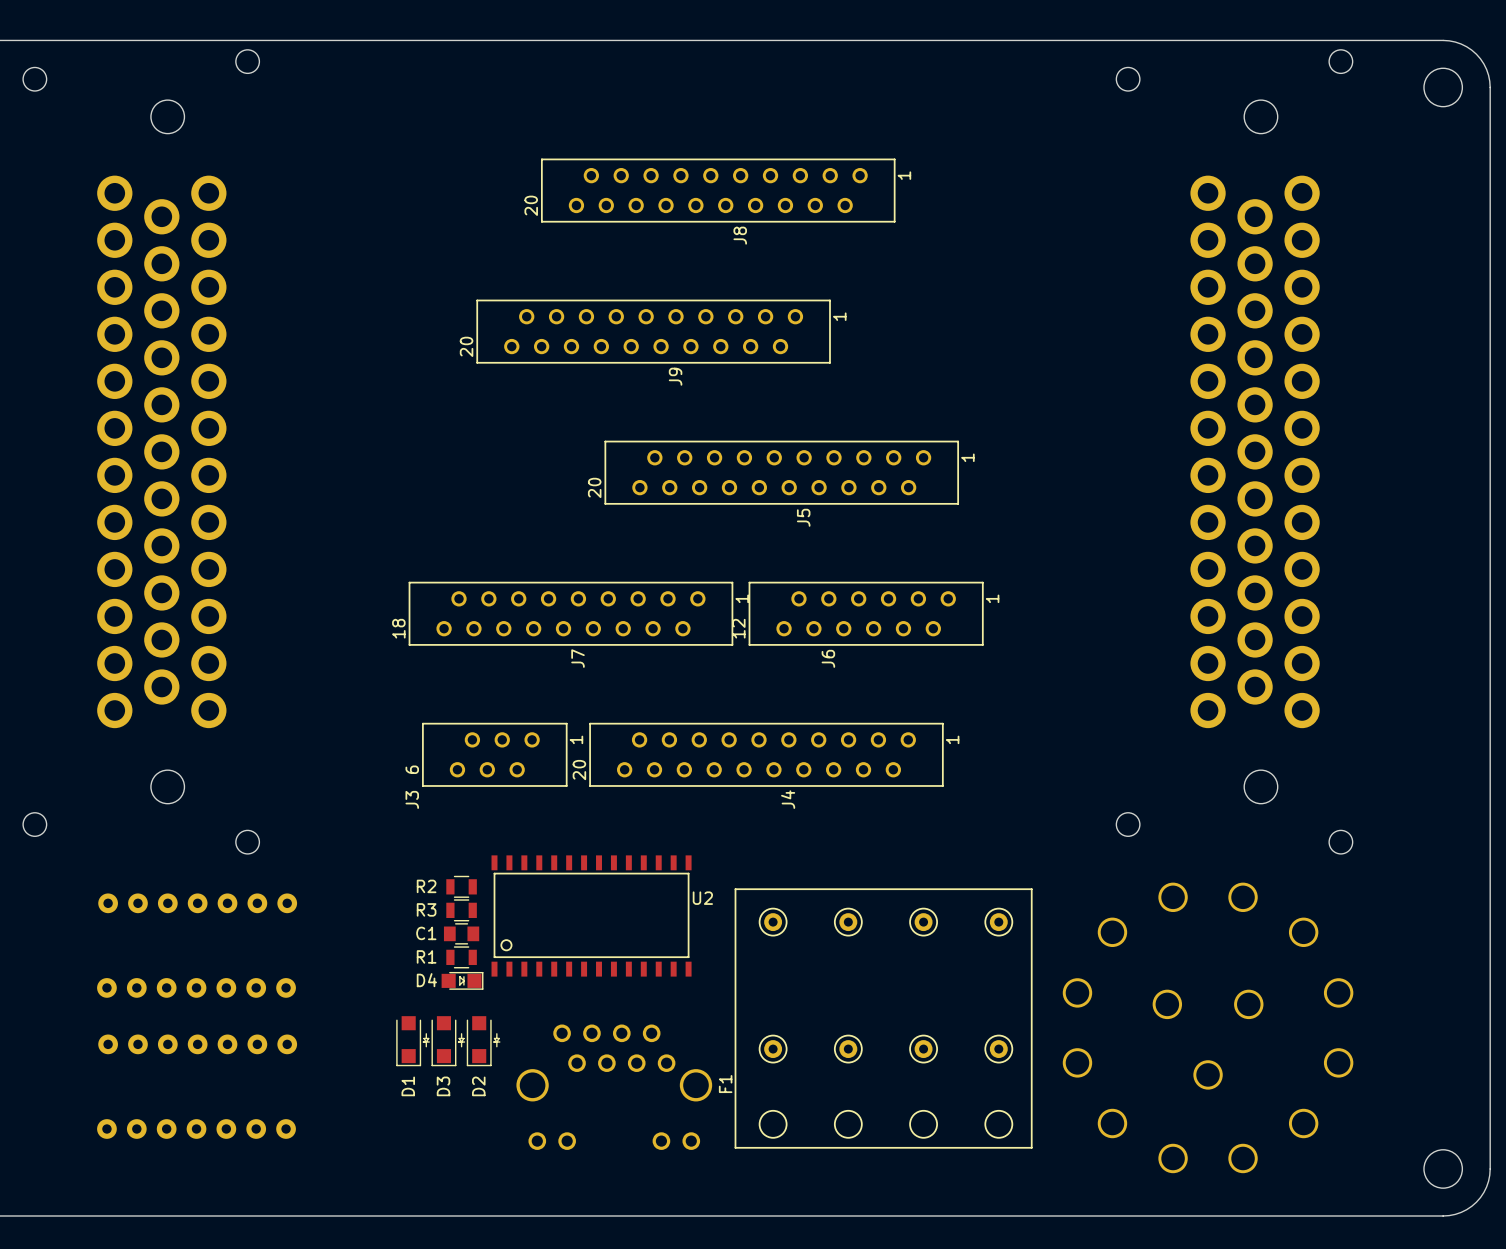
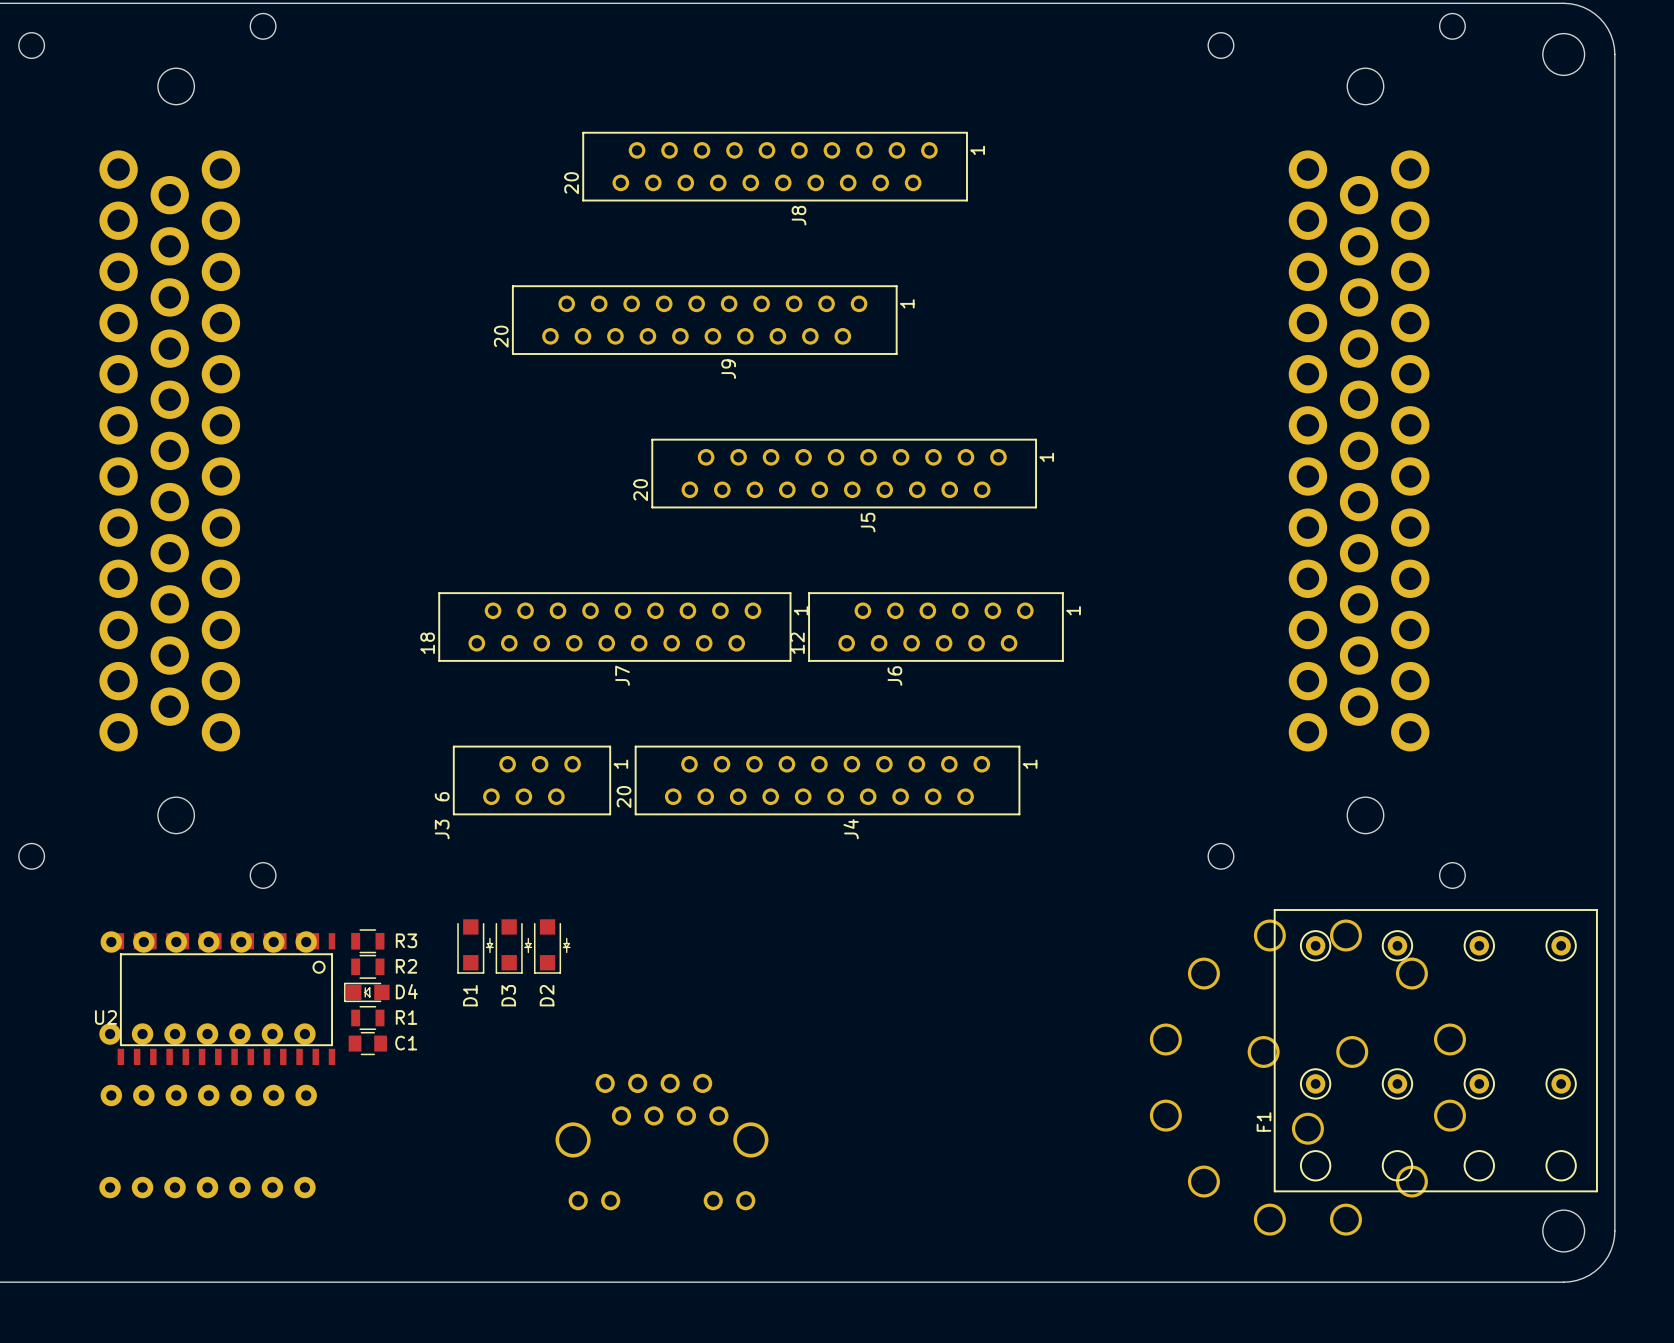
R2 name position: R2 (426, 886) -> R2 (406, 966)
R2 position: (461, 886) -> (367, 966)
R3 name position: R3 (426, 909) -> R3 (406, 940)
R3 position: (461, 910) -> (367, 941)
U2 rotation: 0° (591, 915) -> 180° (226, 999)
U2 position: (591, 915) -> (226, 999)
C1 name position: C1 (426, 933) -> C1 (406, 1043)
C1 position: (461, 933) -> (367, 1043)
R1 name position: R1 (426, 956) -> R1 (406, 1017)
R1 position: (461, 957) -> (367, 1017)
D4 rotation: 0° (462, 980) -> 180° (366, 992)
D4 position: (462, 980) -> (366, 992)
F1 position: (883, 1018) -> (1435, 1050)
D1 position: (413, 1041) -> (475, 946)
D3 position: (448, 1041) -> (513, 946)
D2 position: (483, 1041) -> (552, 946)

